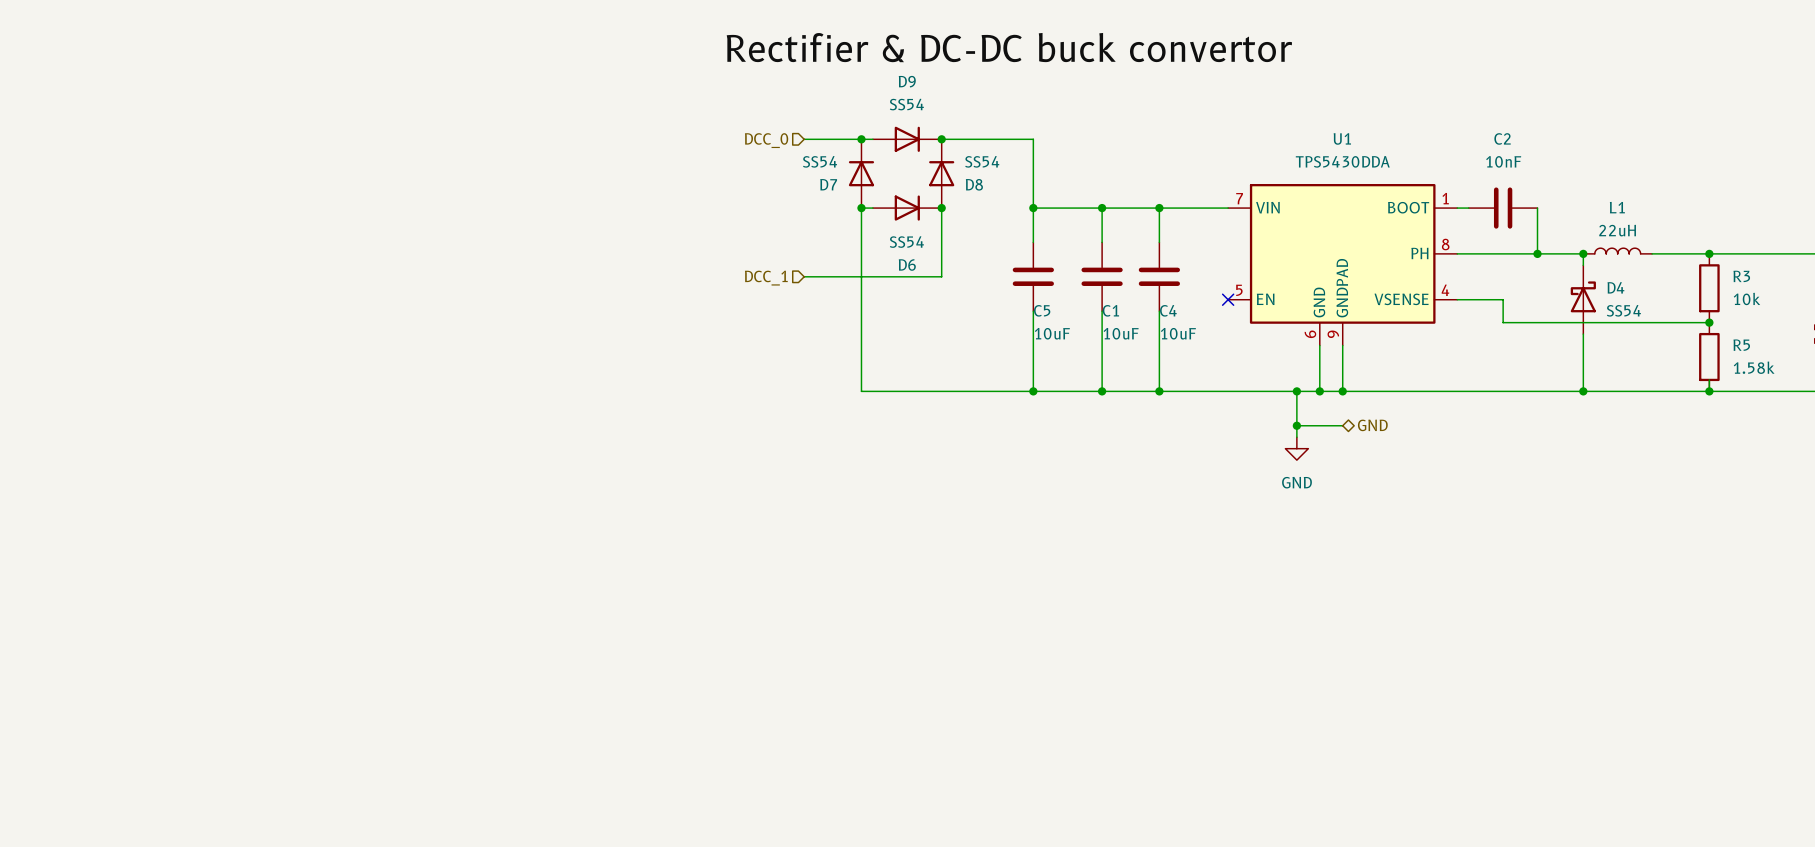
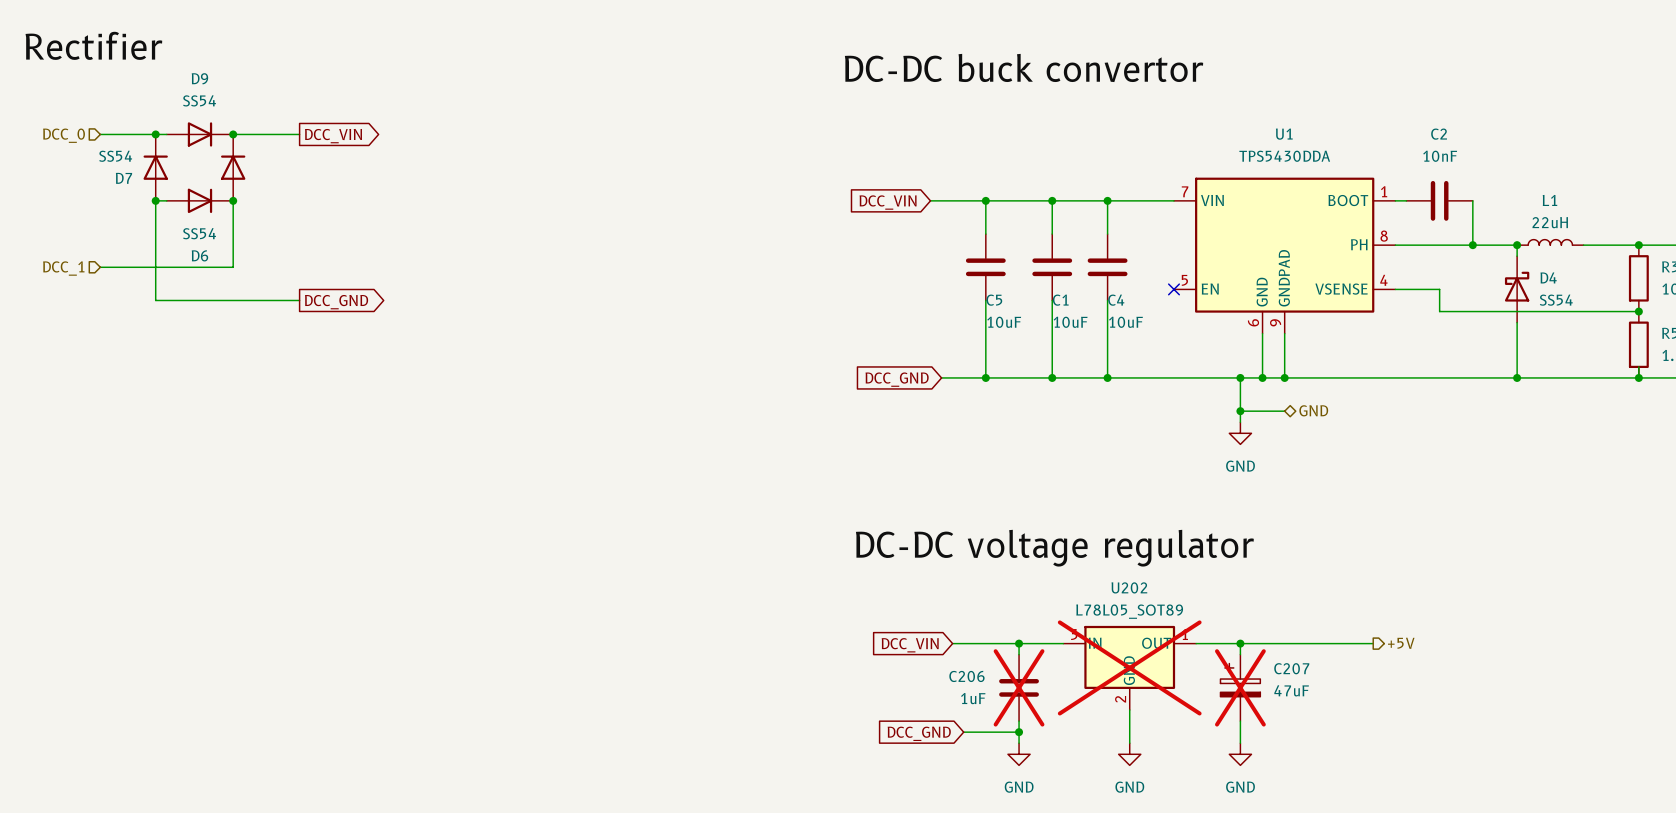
label: none -> Rectifier (93, 45)
label: Rectifier & DC-DC buck convertor (1009, 47) -> DC-DC buck convertor (1024, 67)
wire: none -> (100, 134) (166, 134)
junction: none -> (155, 134)
wire: none -> (233, 134) (299, 134)
junction: none -> (233, 134)
wire: (804, 139) (872, 139) -> none
junction: (861, 139) -> none
D9 position: (907, 139) -> (199, 134)
wire: (941, 139) (1033, 139) (1033, 208) -> (930, 200) (985, 200)
junction: (941, 139) -> none
hierarchical label: none -> DCC_0 (64, 135)
hierarchical label: DCC_0 (766, 140) -> none
global label: none -> DCC_VIN (333, 136)
part: none -> (233, 167)
D7 position: (861, 173) -> (155, 167)
D8: SS54 (941, 173) -> none
junction: none -> (155, 200)
wire: none -> (166, 200) (155, 200) (155, 300) (299, 300)
wire: none -> (233, 200) (233, 267) (100, 267)
junction: none -> (233, 200)
junction: (861, 208) -> none
wire: (872, 208) (861, 208) (861, 391) (987, 391) -> none
D6 position: (907, 208) -> (199, 200)
wire: (941, 208) (941, 276) (804, 276) -> none
junction: (941, 208) -> none
global label: none -> DCC_VIN (888, 202)
hierarchical label: none -> DCC_1 (63, 268)
hierarchical label: DCC_1 (766, 278) -> none
global label: none -> DCC_GND (336, 302)
global label: none -> DCC_GND (897, 379)
label: none -> DC-DC voltage regulator (1054, 548)
wire: none -> (952, 643) (1063, 643)
wire: none -> (1019, 643) (1019, 654)
junction: none -> (1019, 643)
wire: none -> (1196, 643) (1373, 643)
wire: none -> (1240, 643) (1240, 654)
junction: none -> (1240, 643)
hierarchical label: none -> +5V (1401, 643)
global label: none -> DCC_VIN (910, 645)
U202: none -> L78L05_SOT89 (1129, 667)
C206: none -> 1uF (1019, 687)
C207: none -> 47uF (1240, 687)
wire: none -> (1129, 710) (1129, 743)
wire: none -> (1019, 721) (1019, 743)
wire: none -> (1240, 721) (1240, 743)
wire: none -> (963, 732) (1019, 732)
junction: none -> (1019, 732)
global label: none -> DCC_GND (919, 733)
power symbol: none -> GND (1019, 754)
power symbol: none -> GND (1129, 754)
power symbol: none -> GND (1240, 754)

